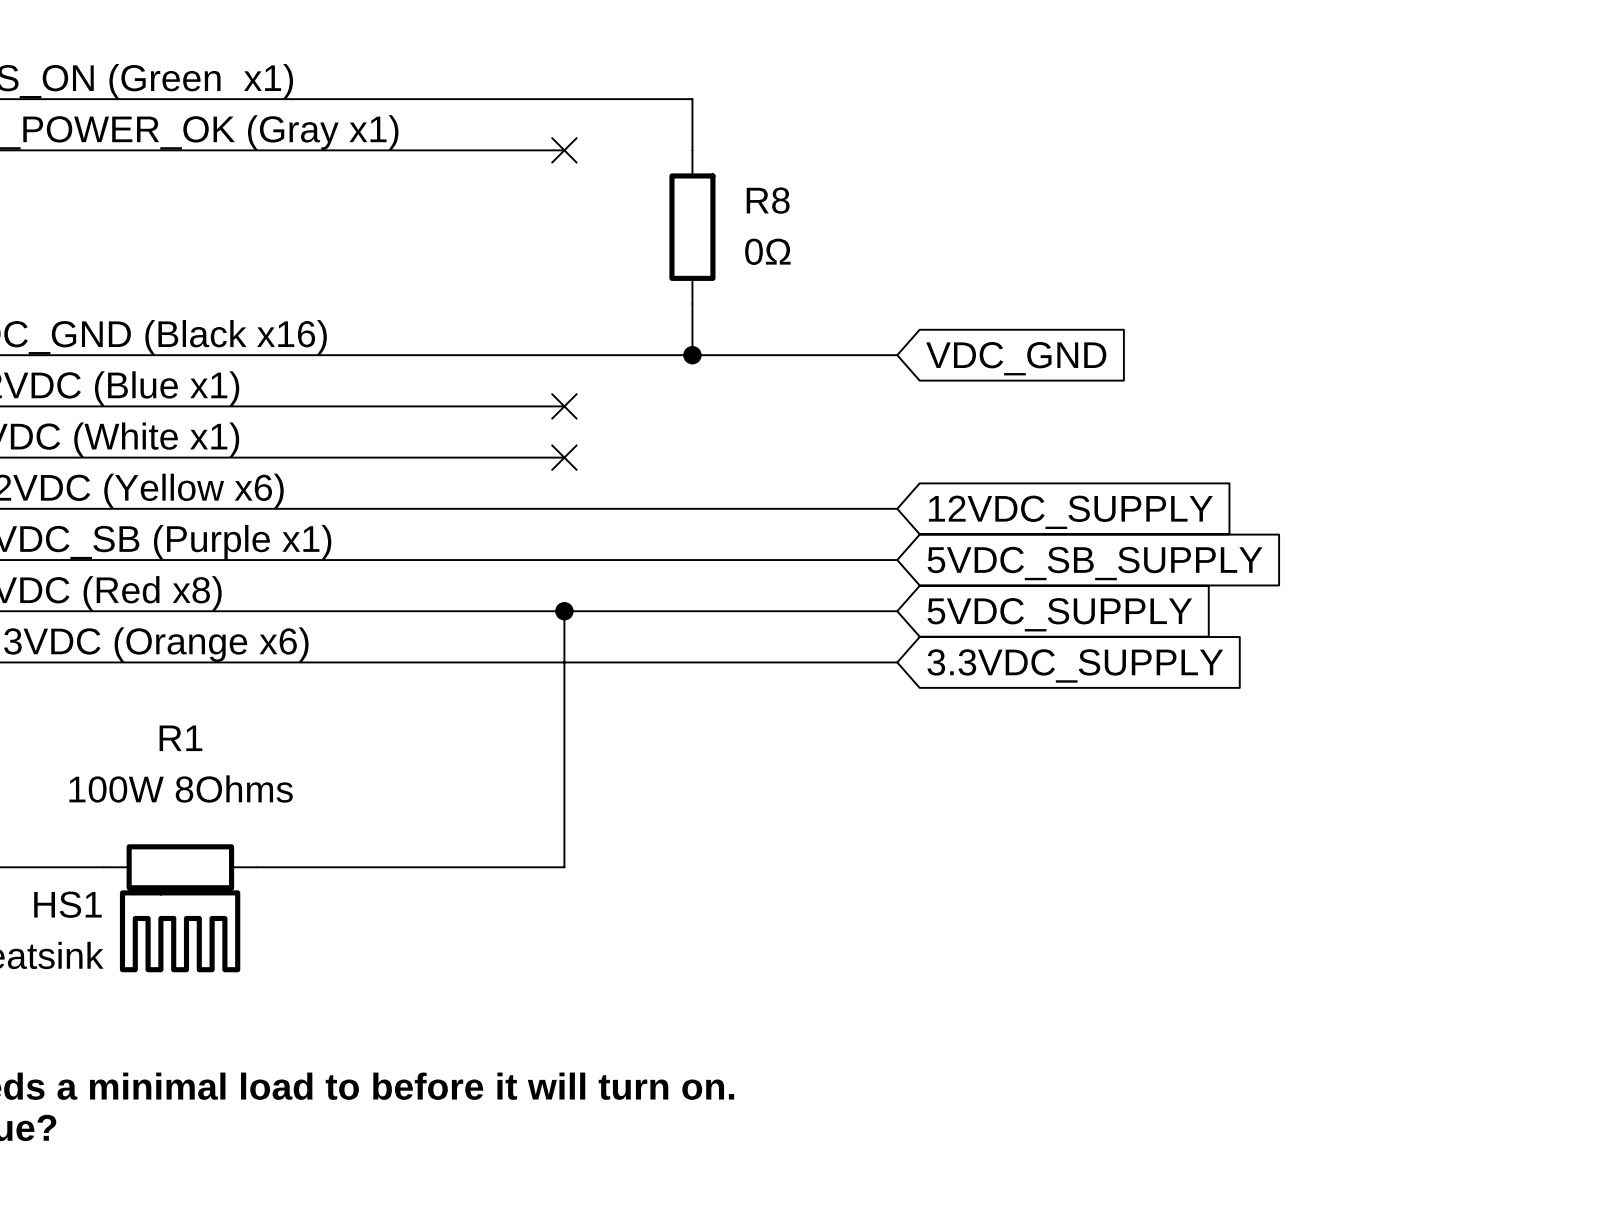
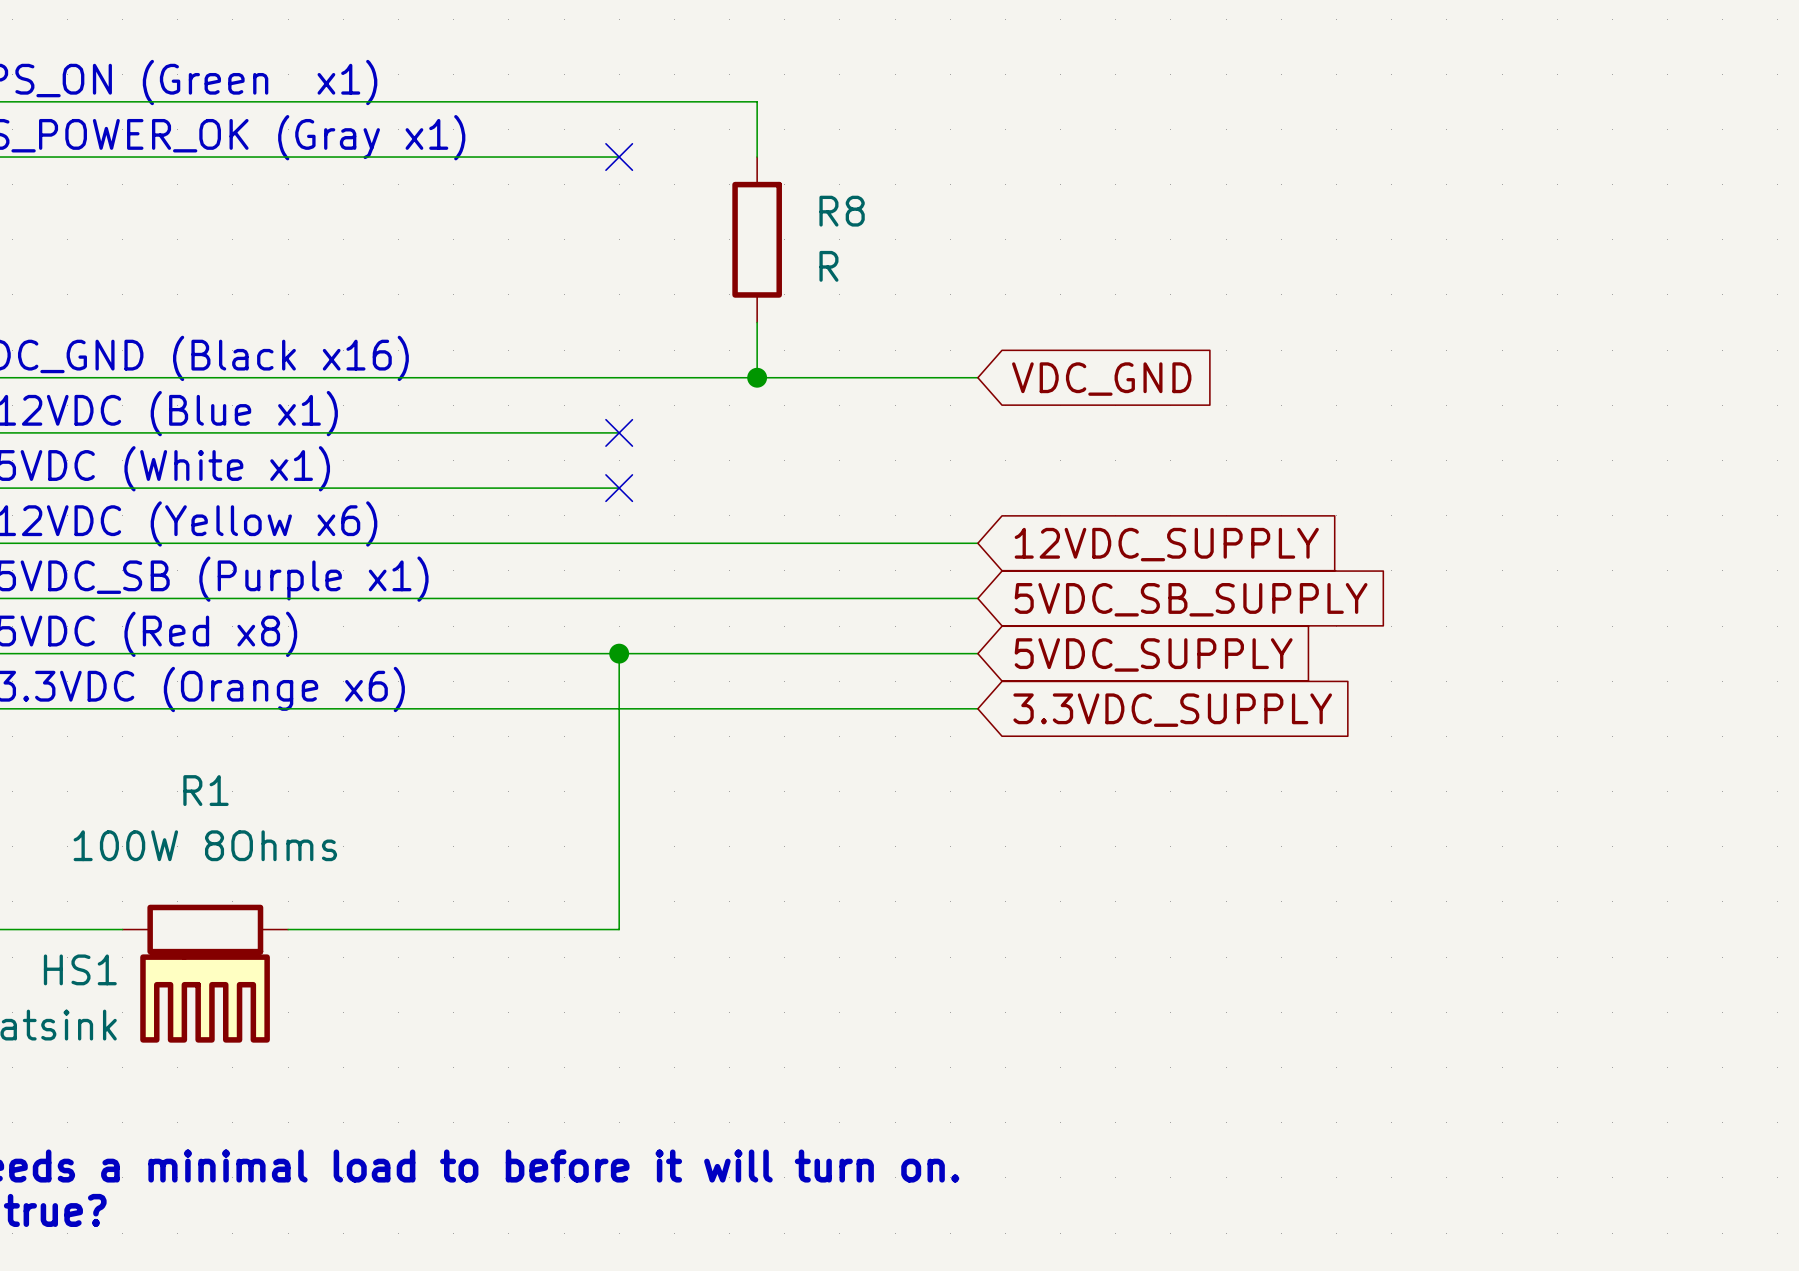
R8 value: 0Ω (767, 251) -> R (828, 266)

